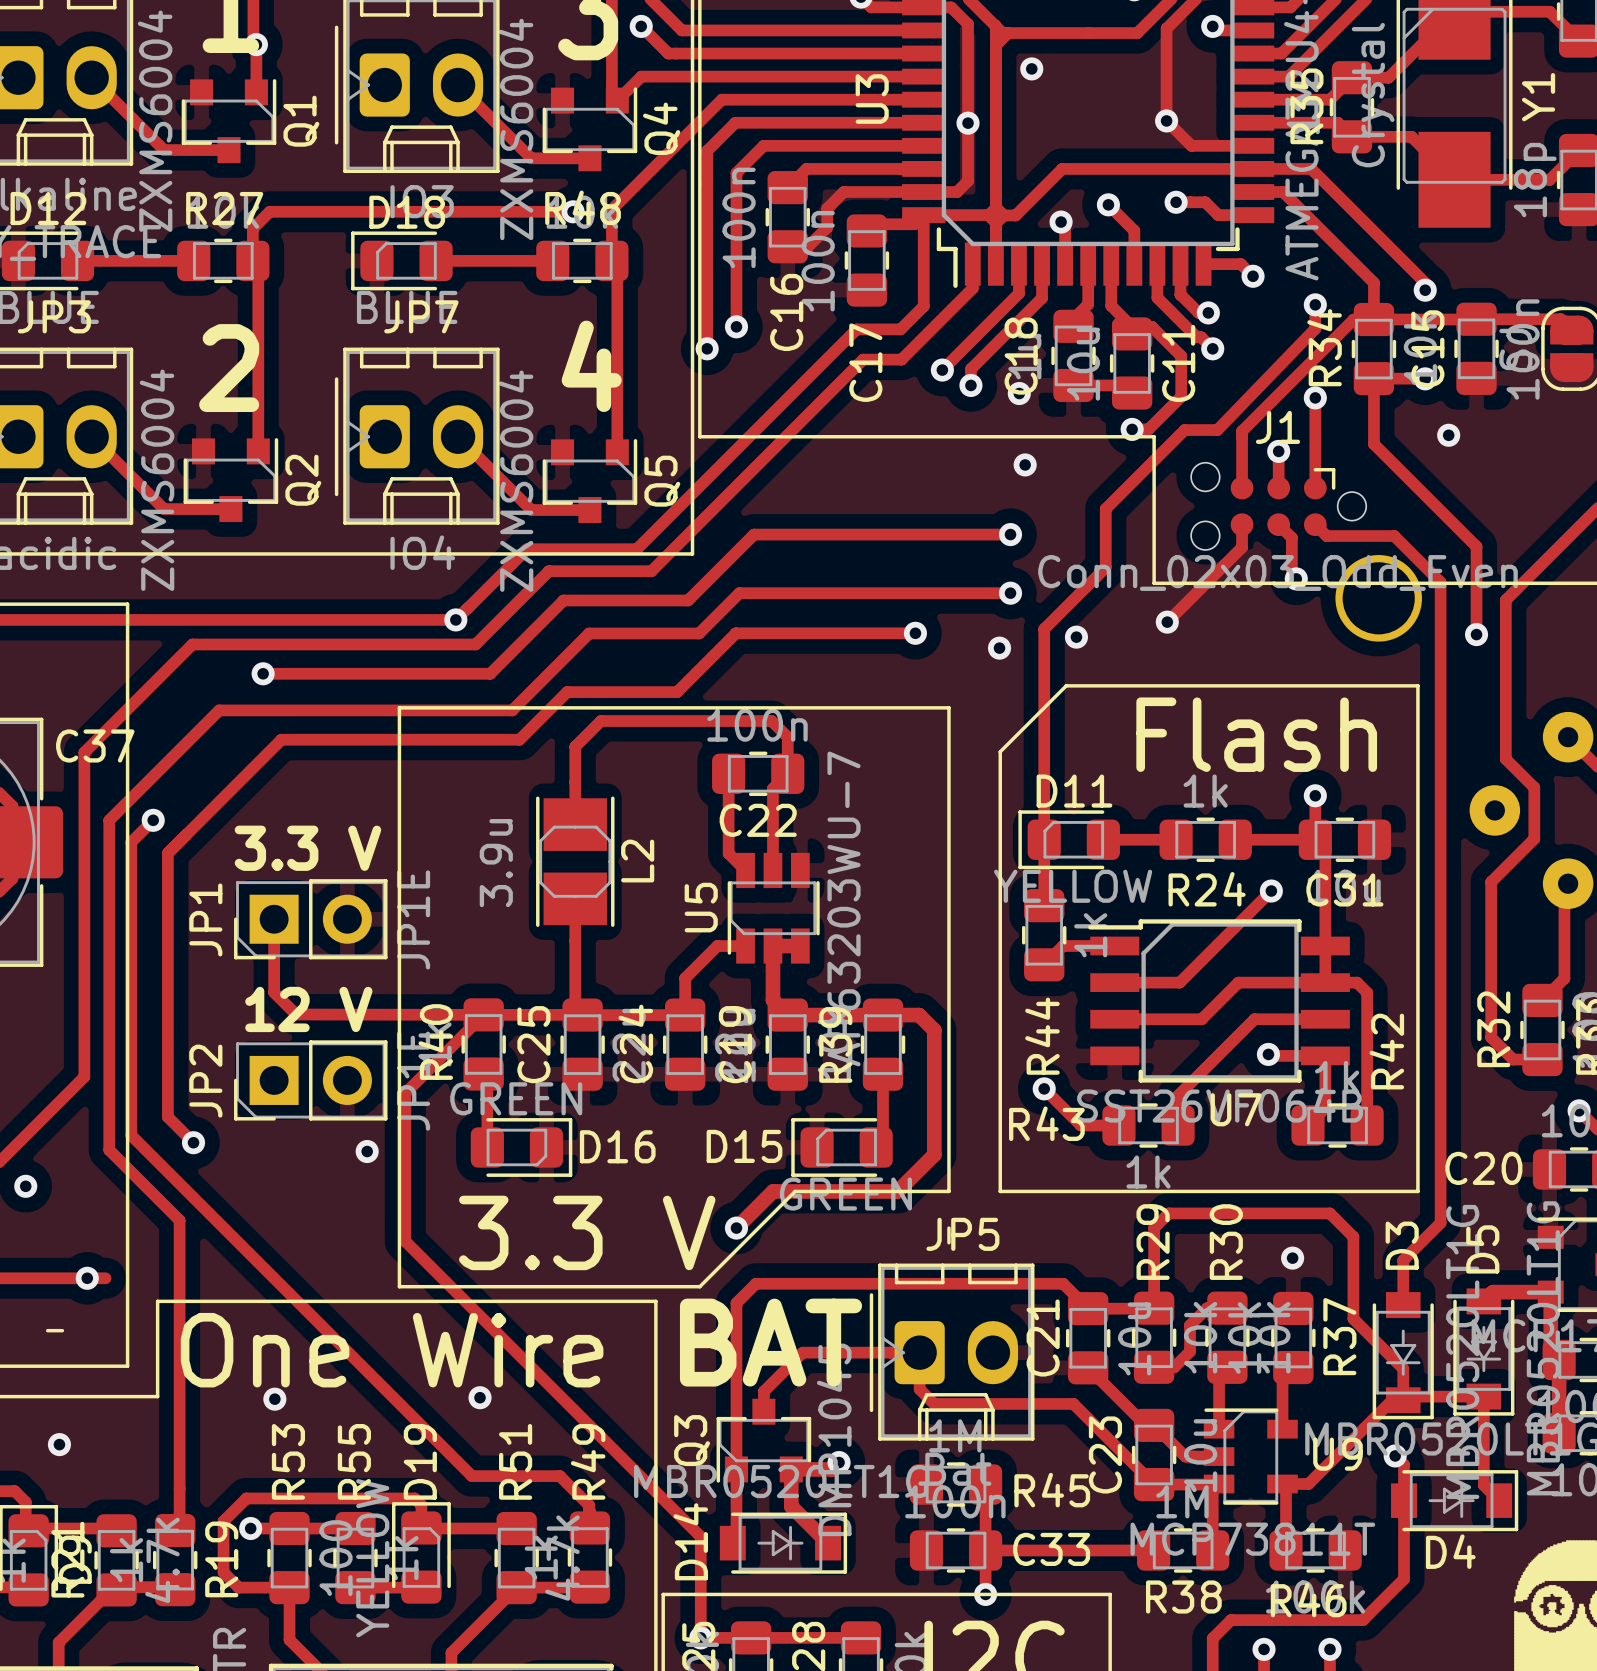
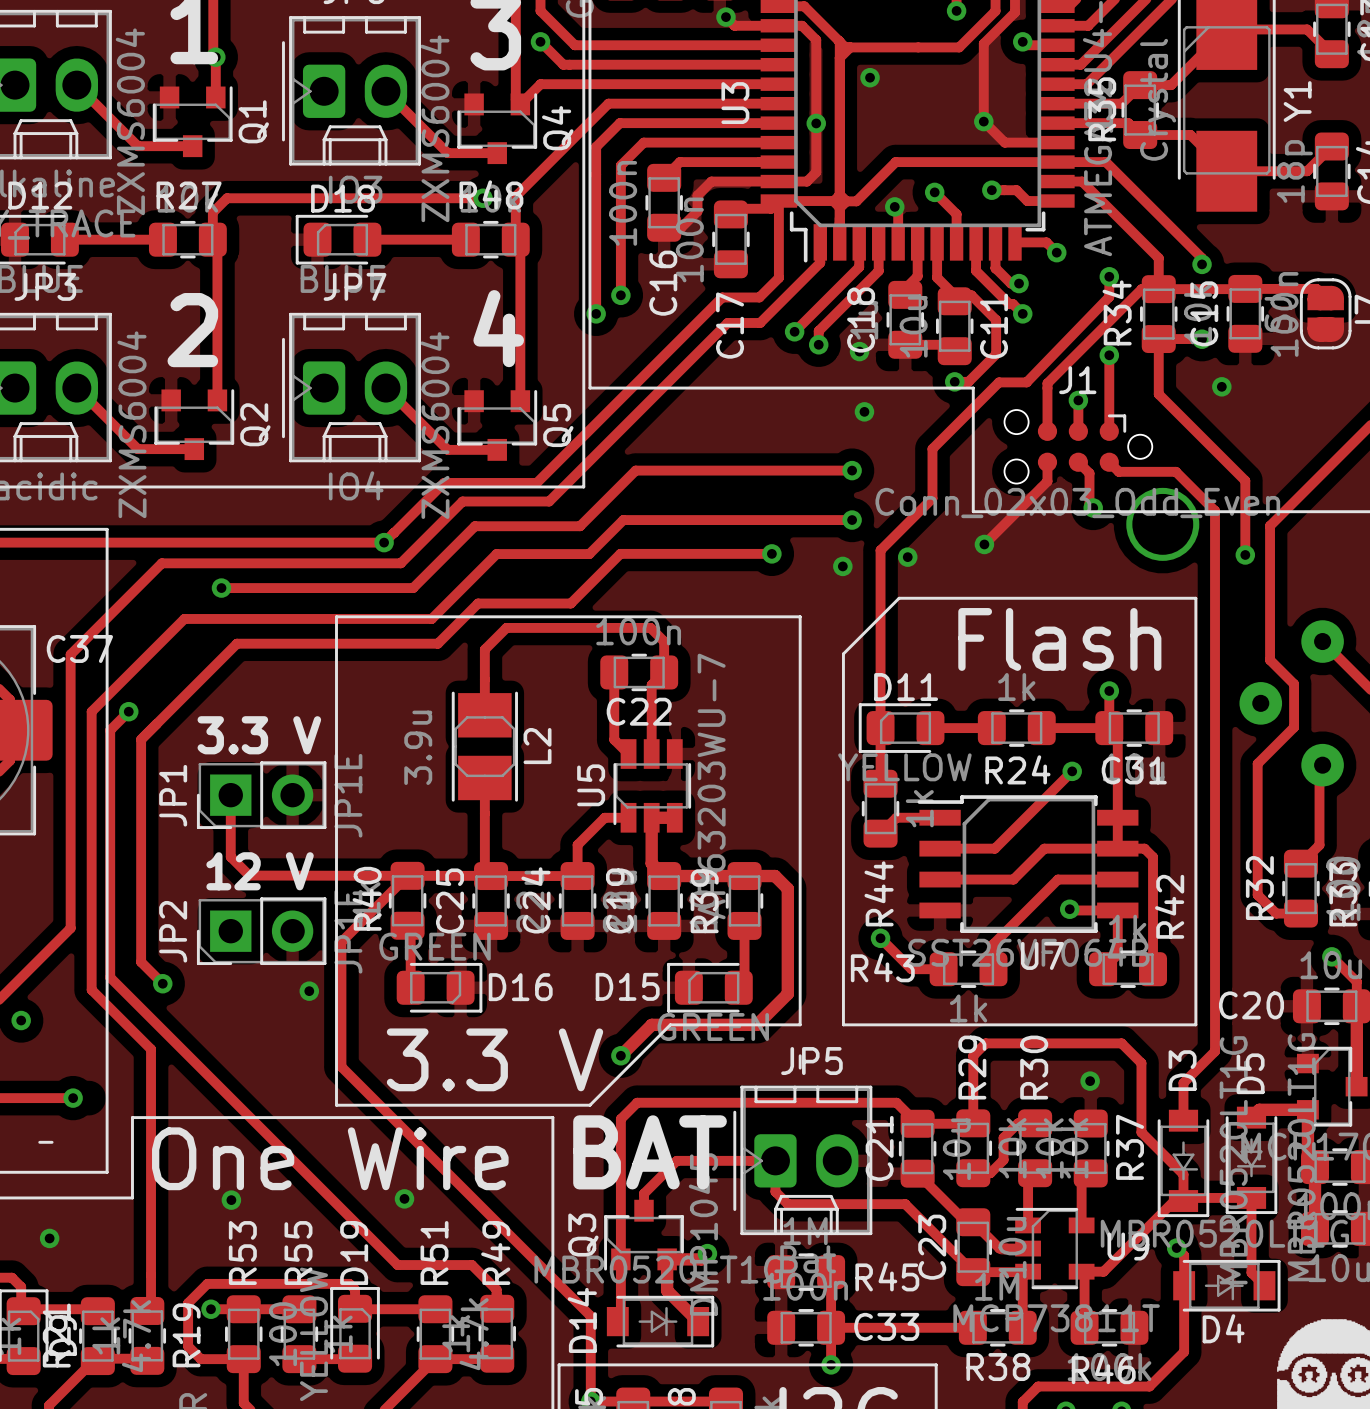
track: (87, 1278) (105, 1278) -> none

